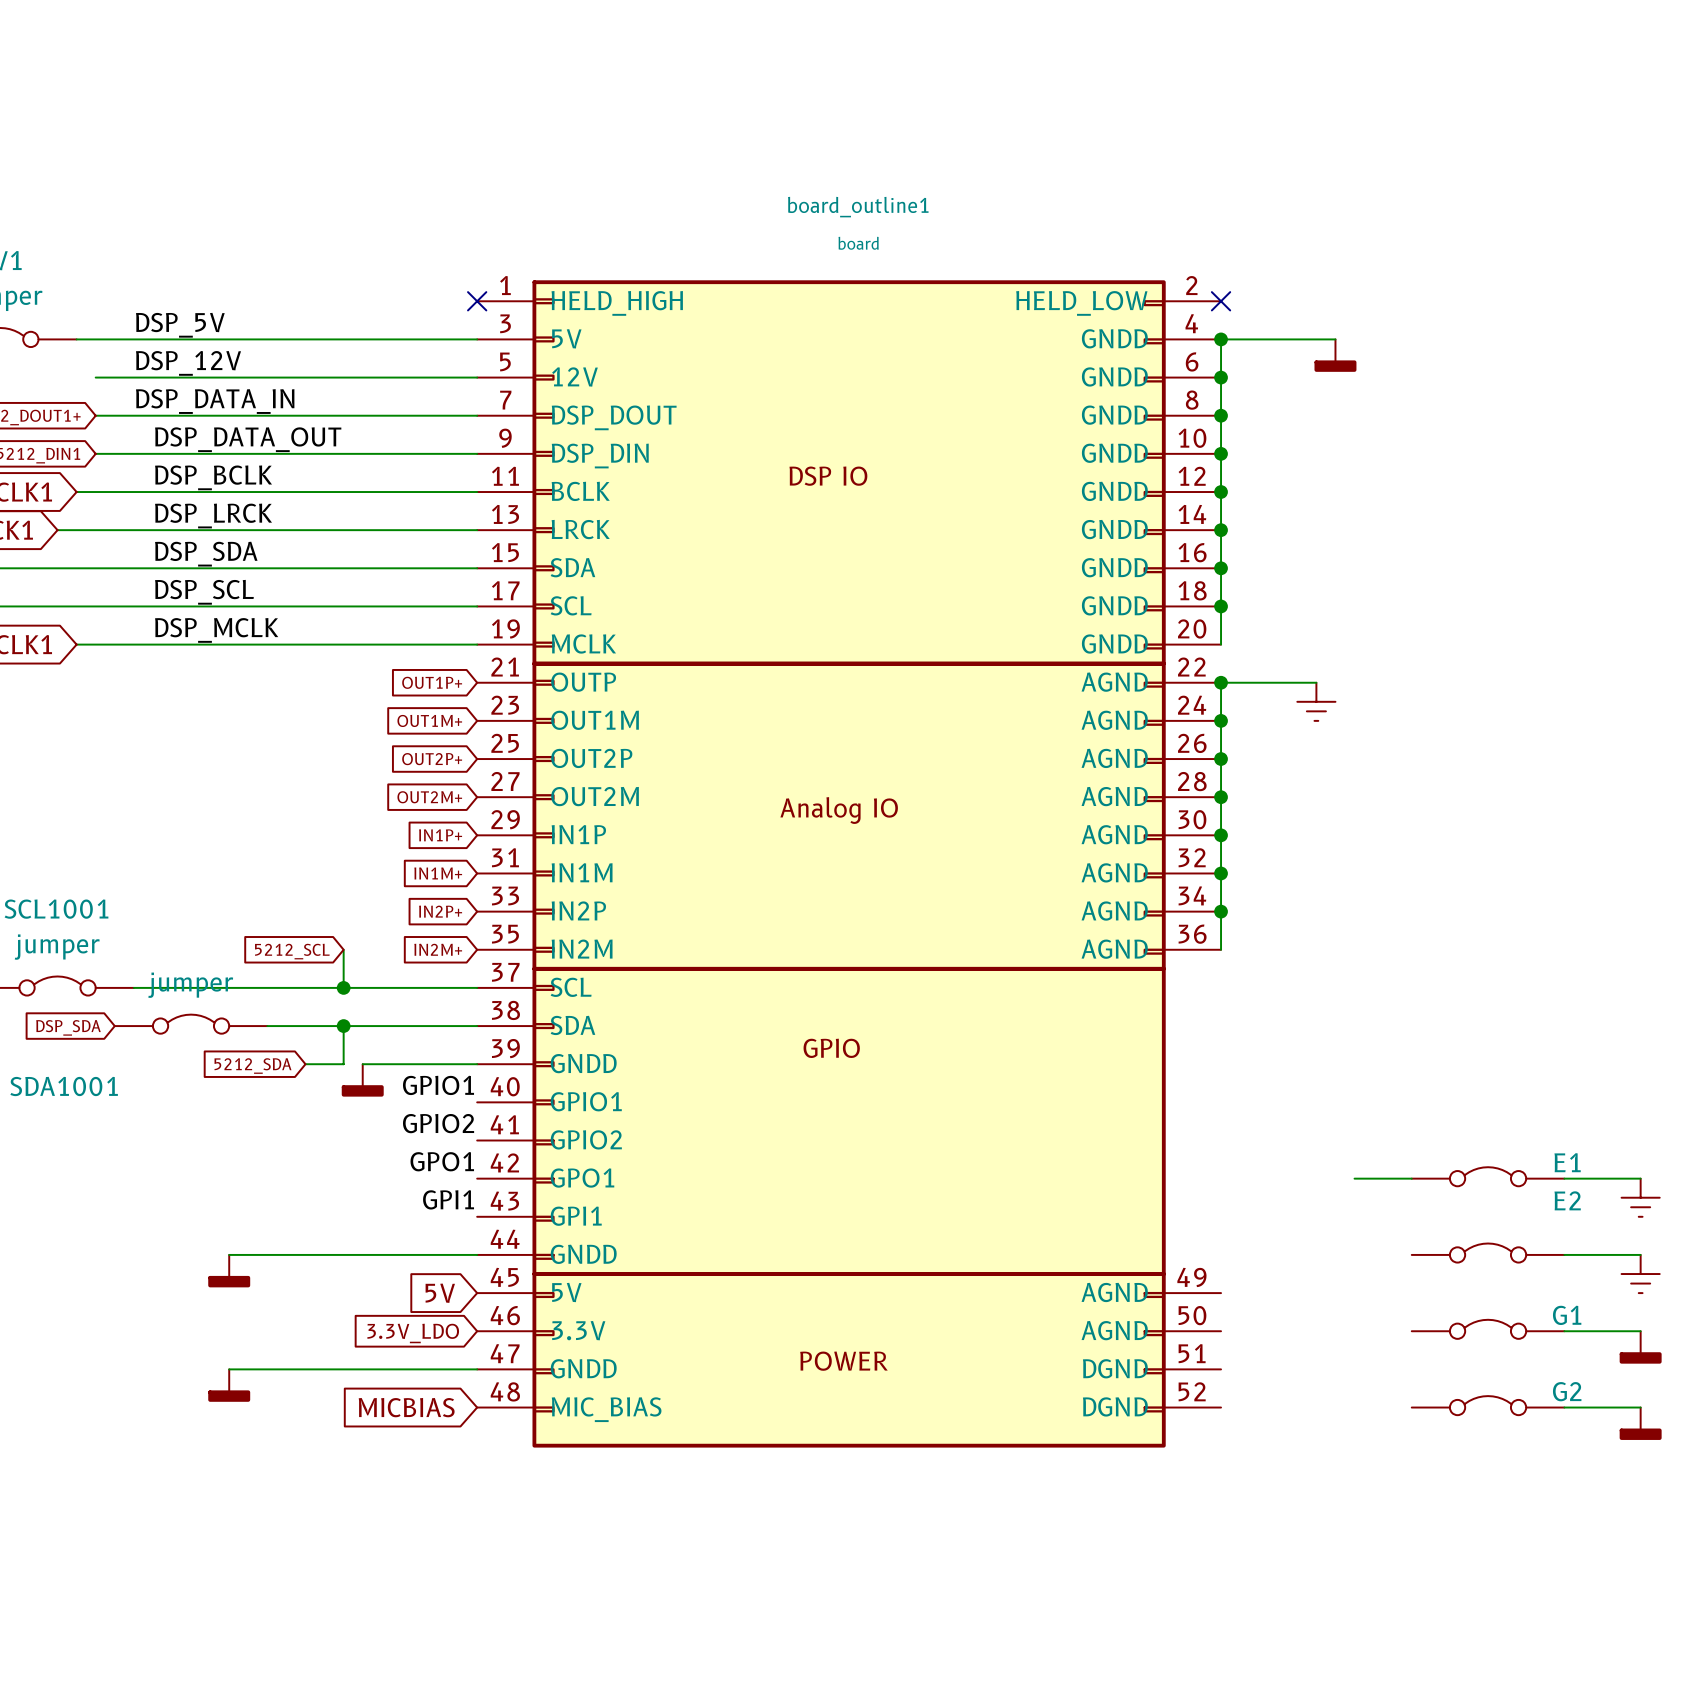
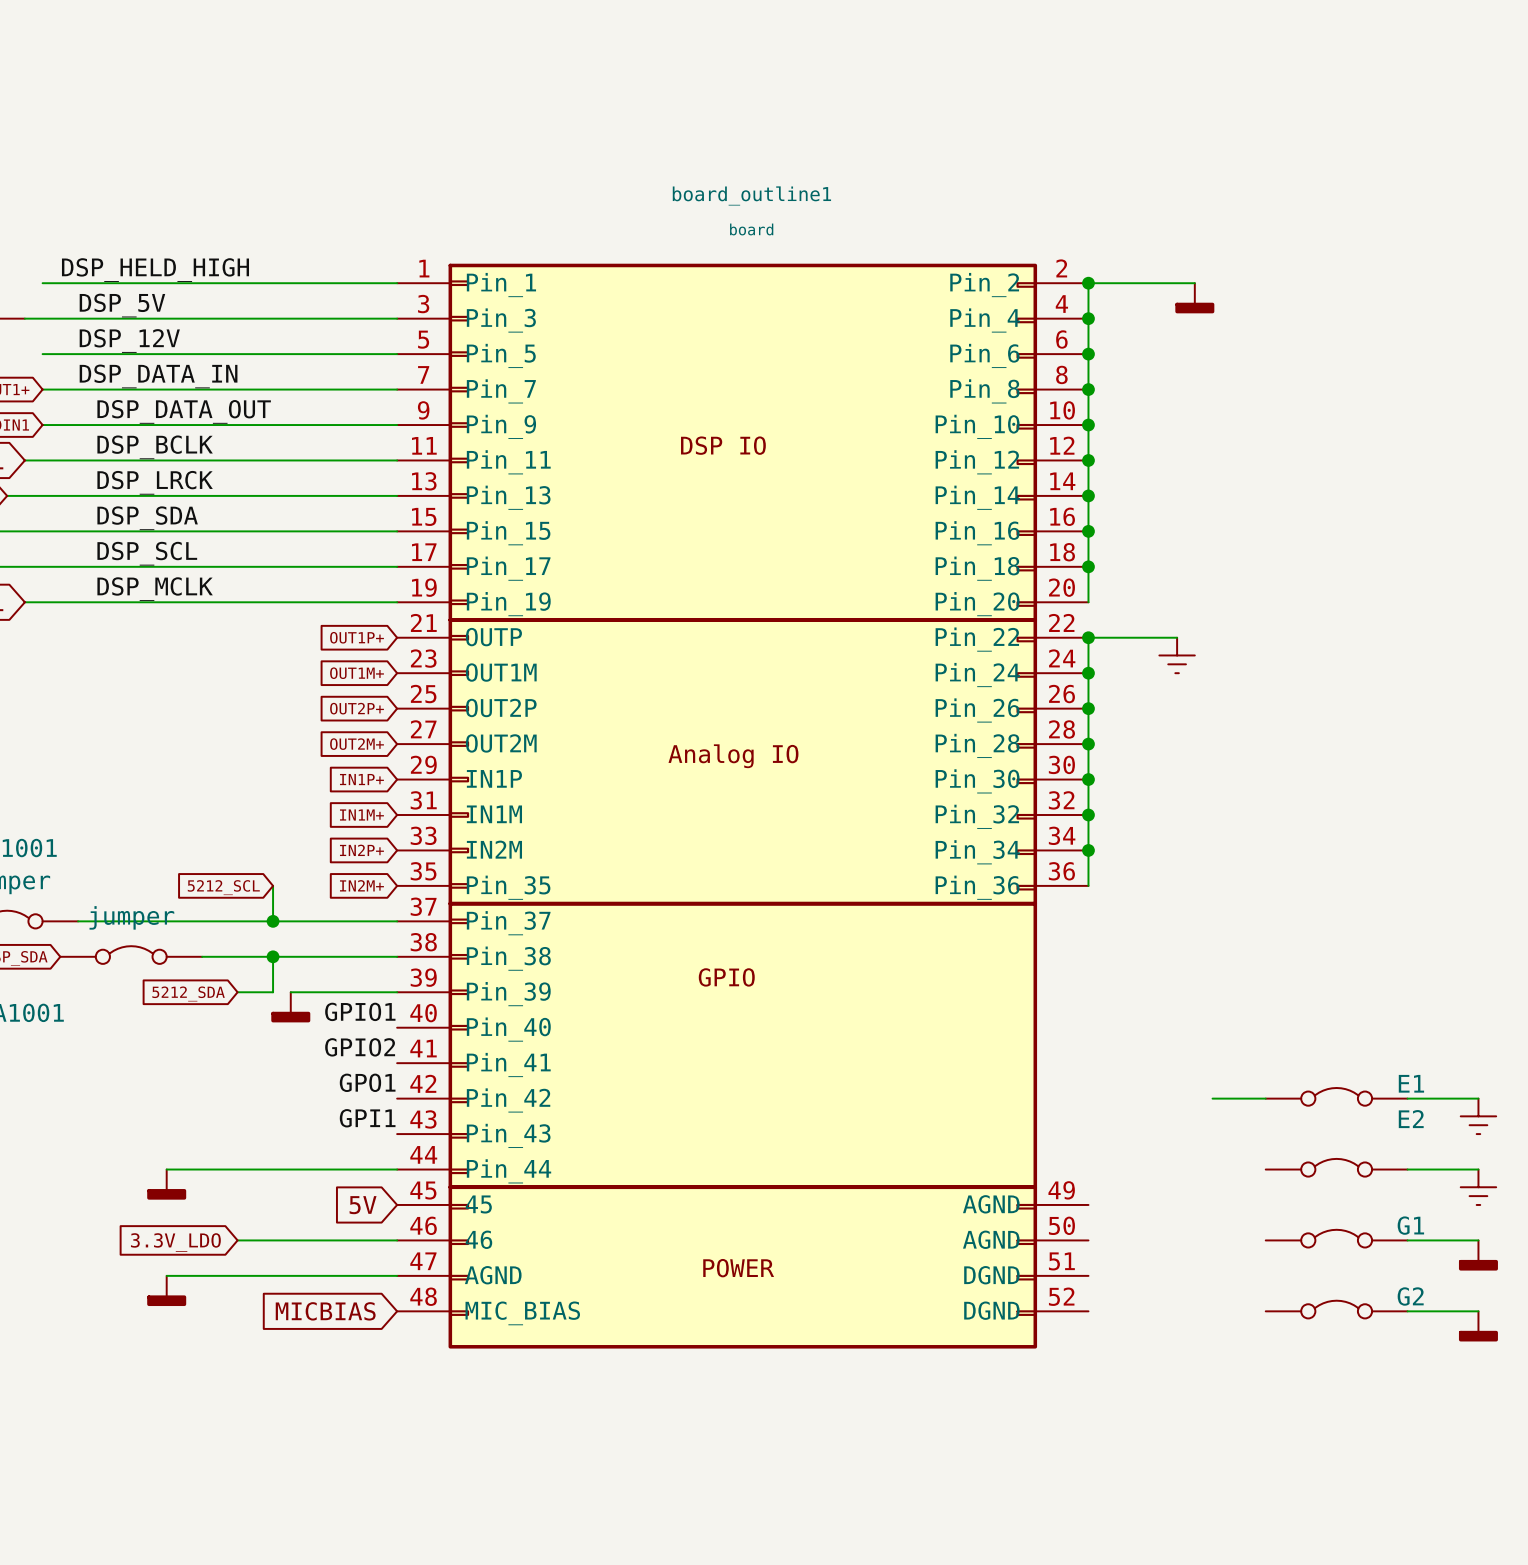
board_outline1 symbol: [477, 280, 1222, 1448] -> [397, 263, 1089, 1349]
label: none -> DSP_HELD_HIGH (155, 270)
wire: none -> (42, 283) (397, 283)
no-connect mark: (477, 301) -> none
no-connect mark: (1221, 301) -> none
junction: none -> (1088, 283)
wire: (1221, 339) (1335, 339) -> (1088, 318) (1088, 283) (1194, 283)
power symbol position: (1335, 355) -> (1194, 298)
wire: none -> (237, 1240) (397, 1240)
global label position: 3.3V_LDO (413, 1333) -> 3.3V_LDO (175, 1242)

